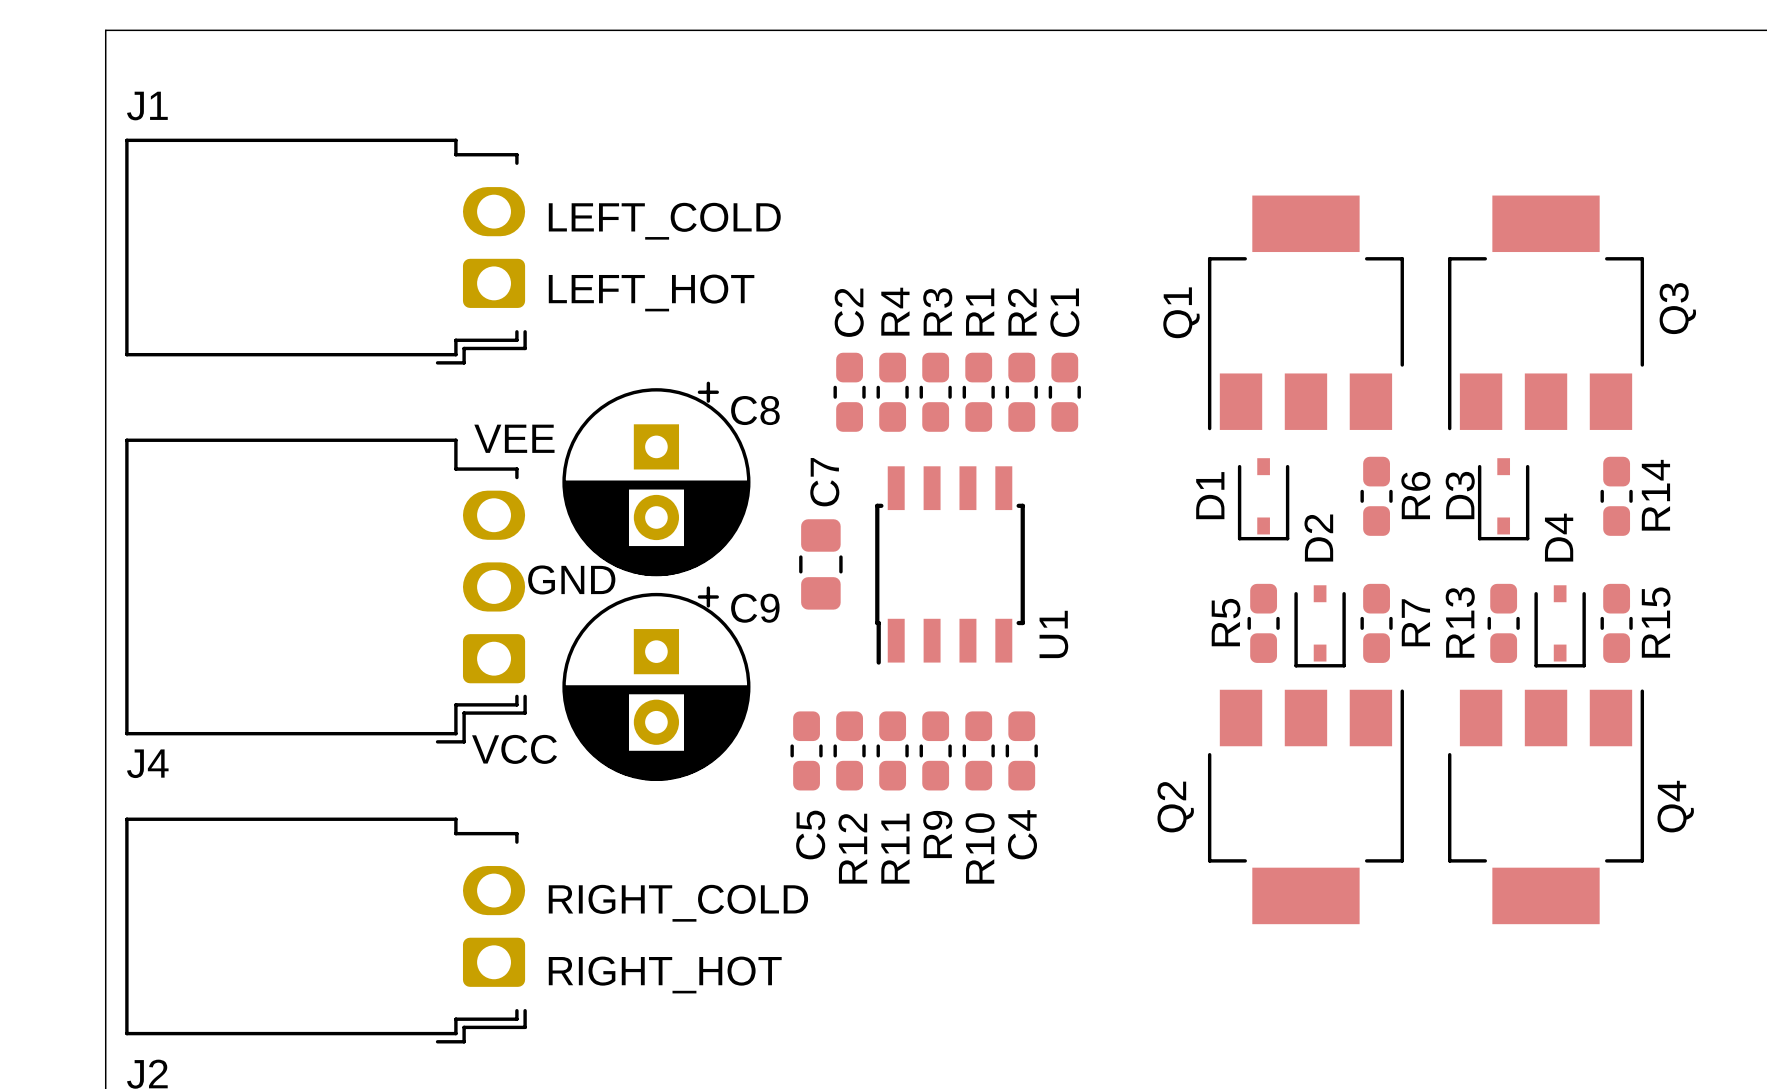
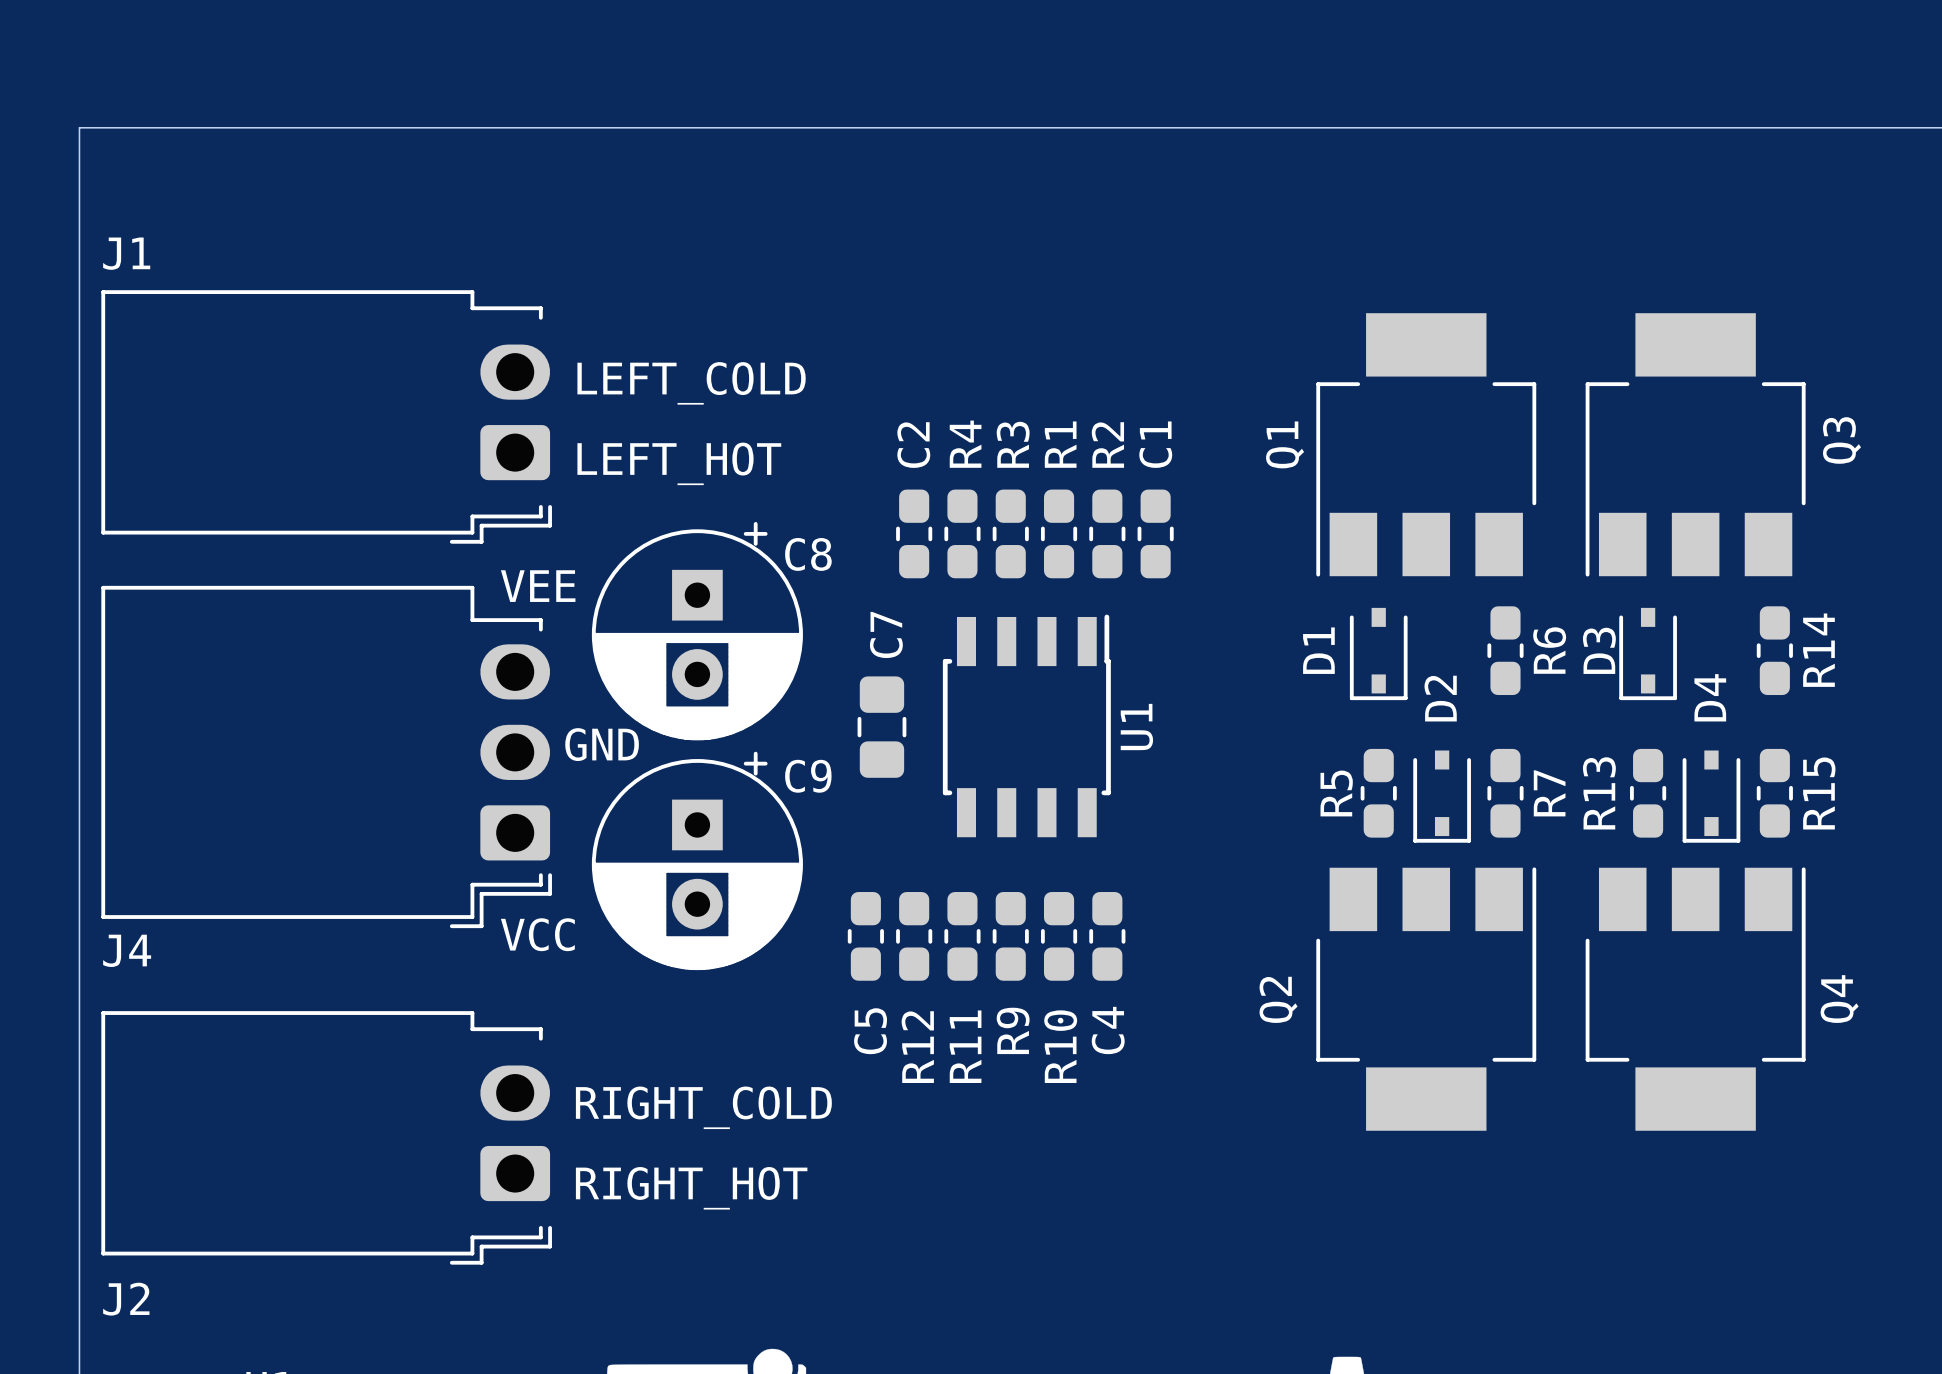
J1 position: (326, 251) -> (326, 416)
U1 rotation: 0° (950, 565) -> 180° (1026, 725)
U1 name position: U1 (1053, 634) -> U1 (1136, 727)

